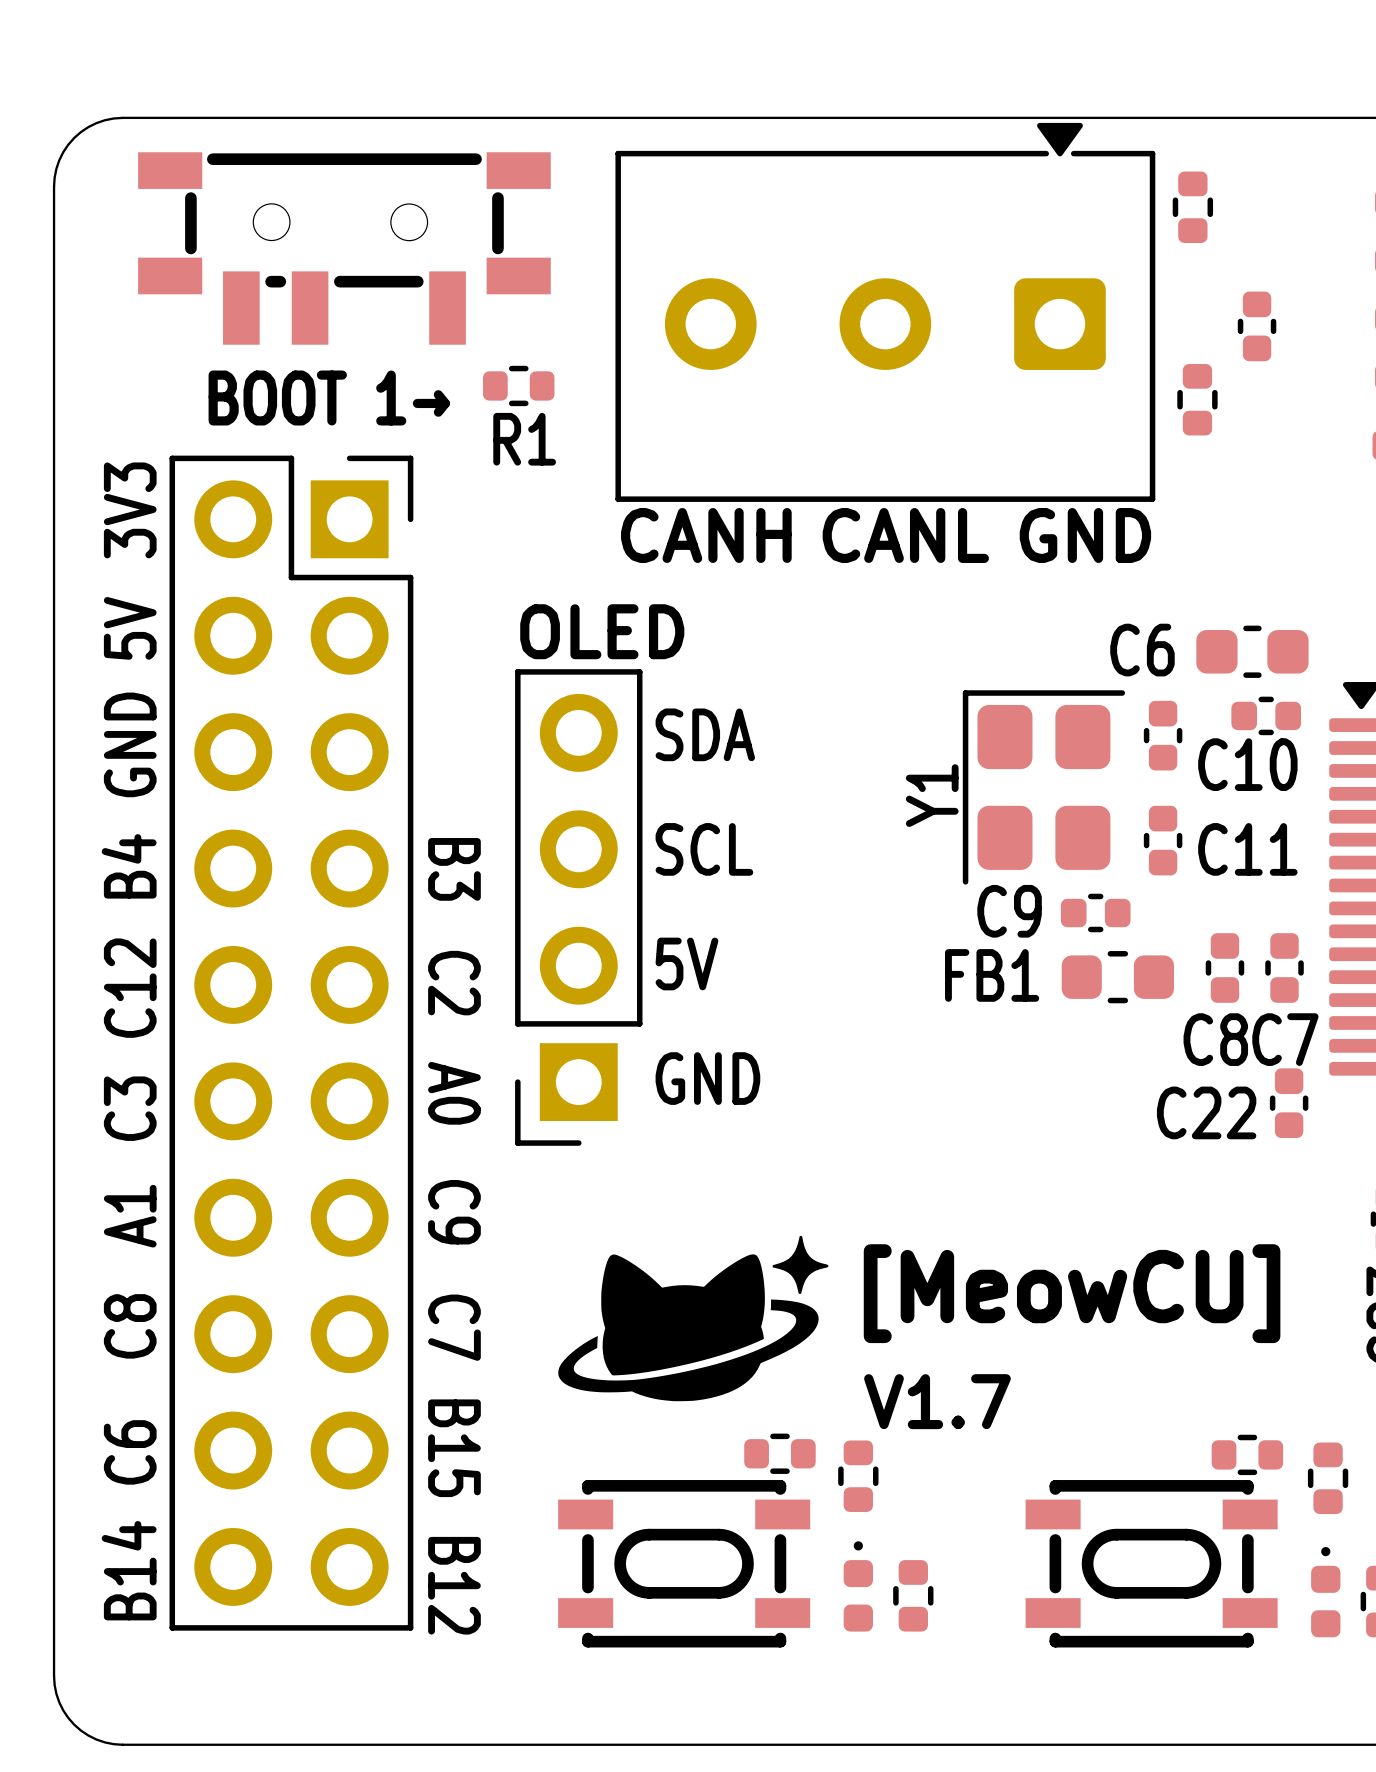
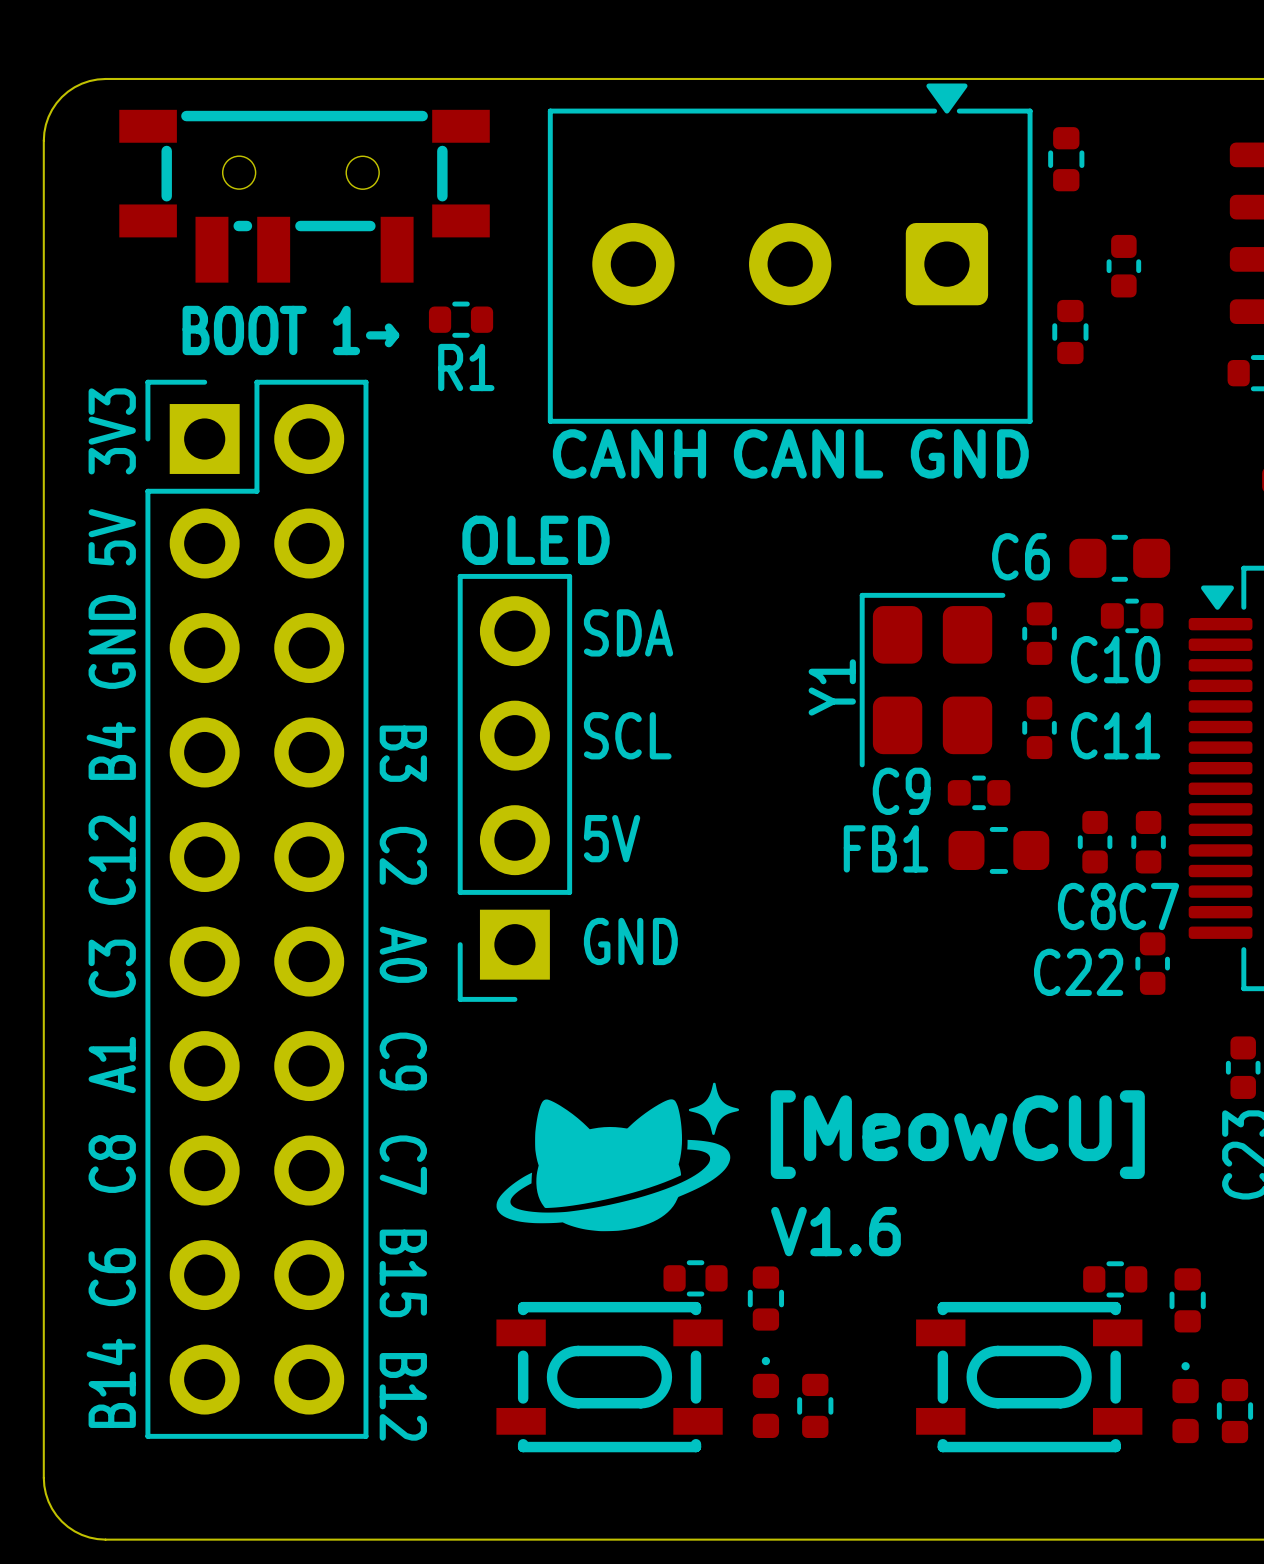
part footprint: [169, 455, 414, 1631] -> [145, 379, 369, 1439]
text: V1.7 (937, 1401) -> V1.6 (835, 1231)

